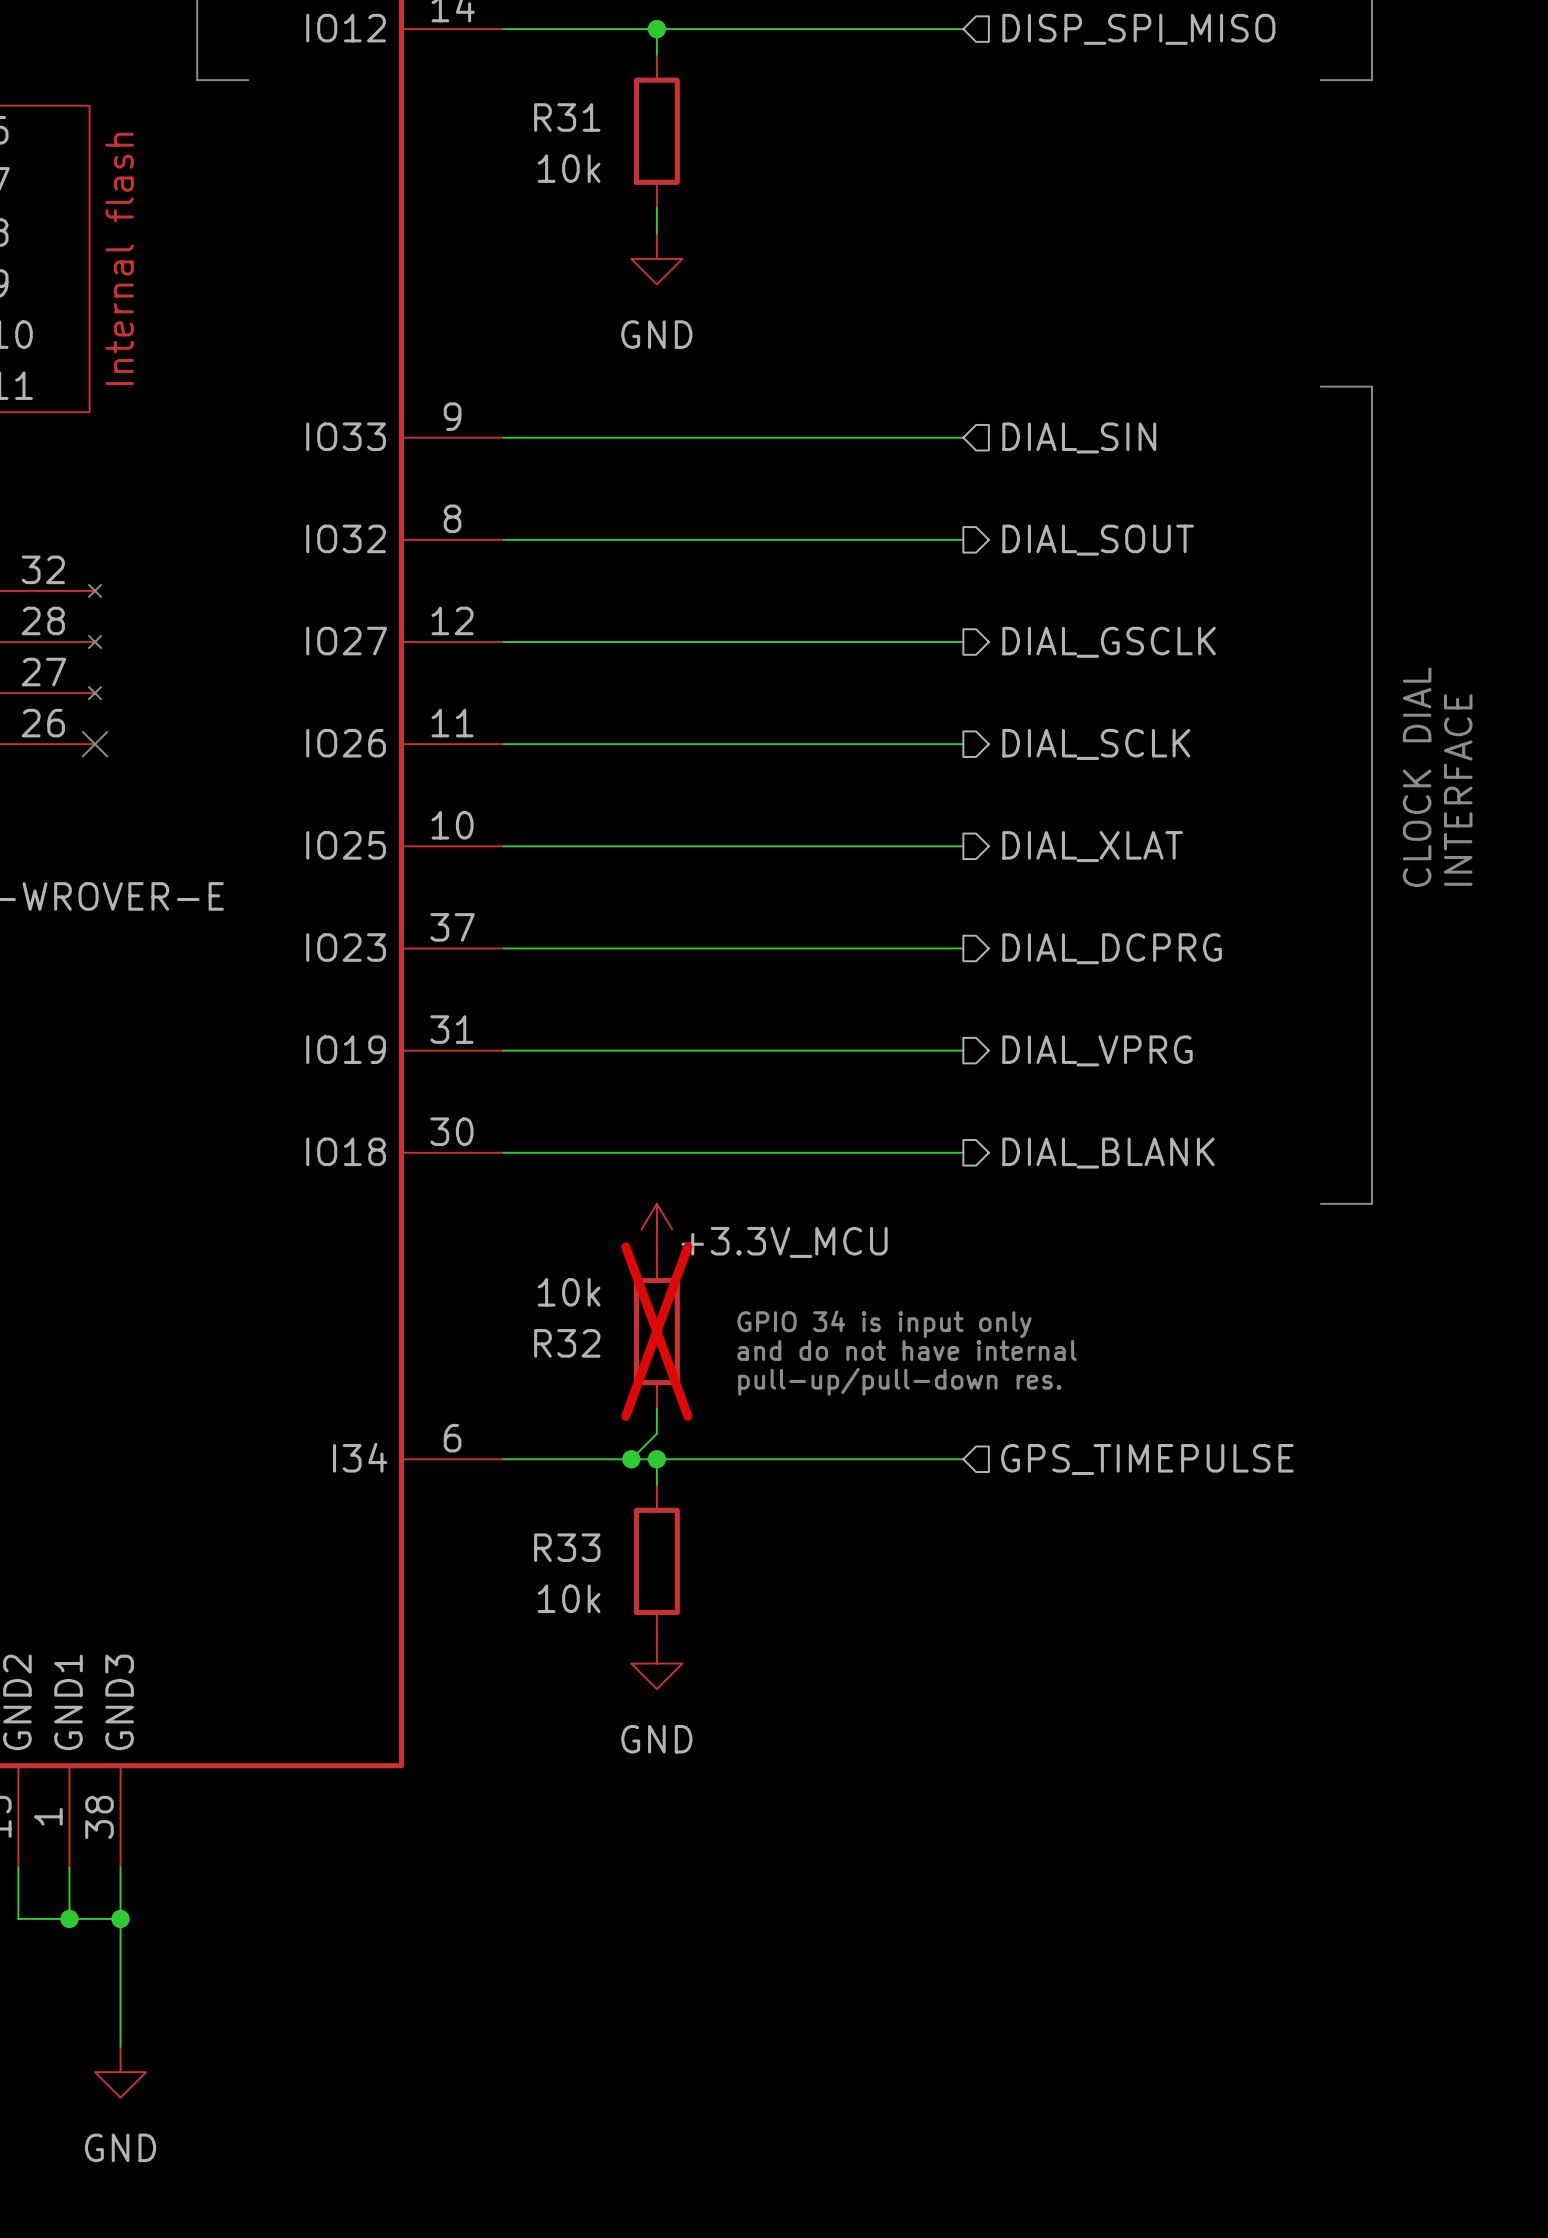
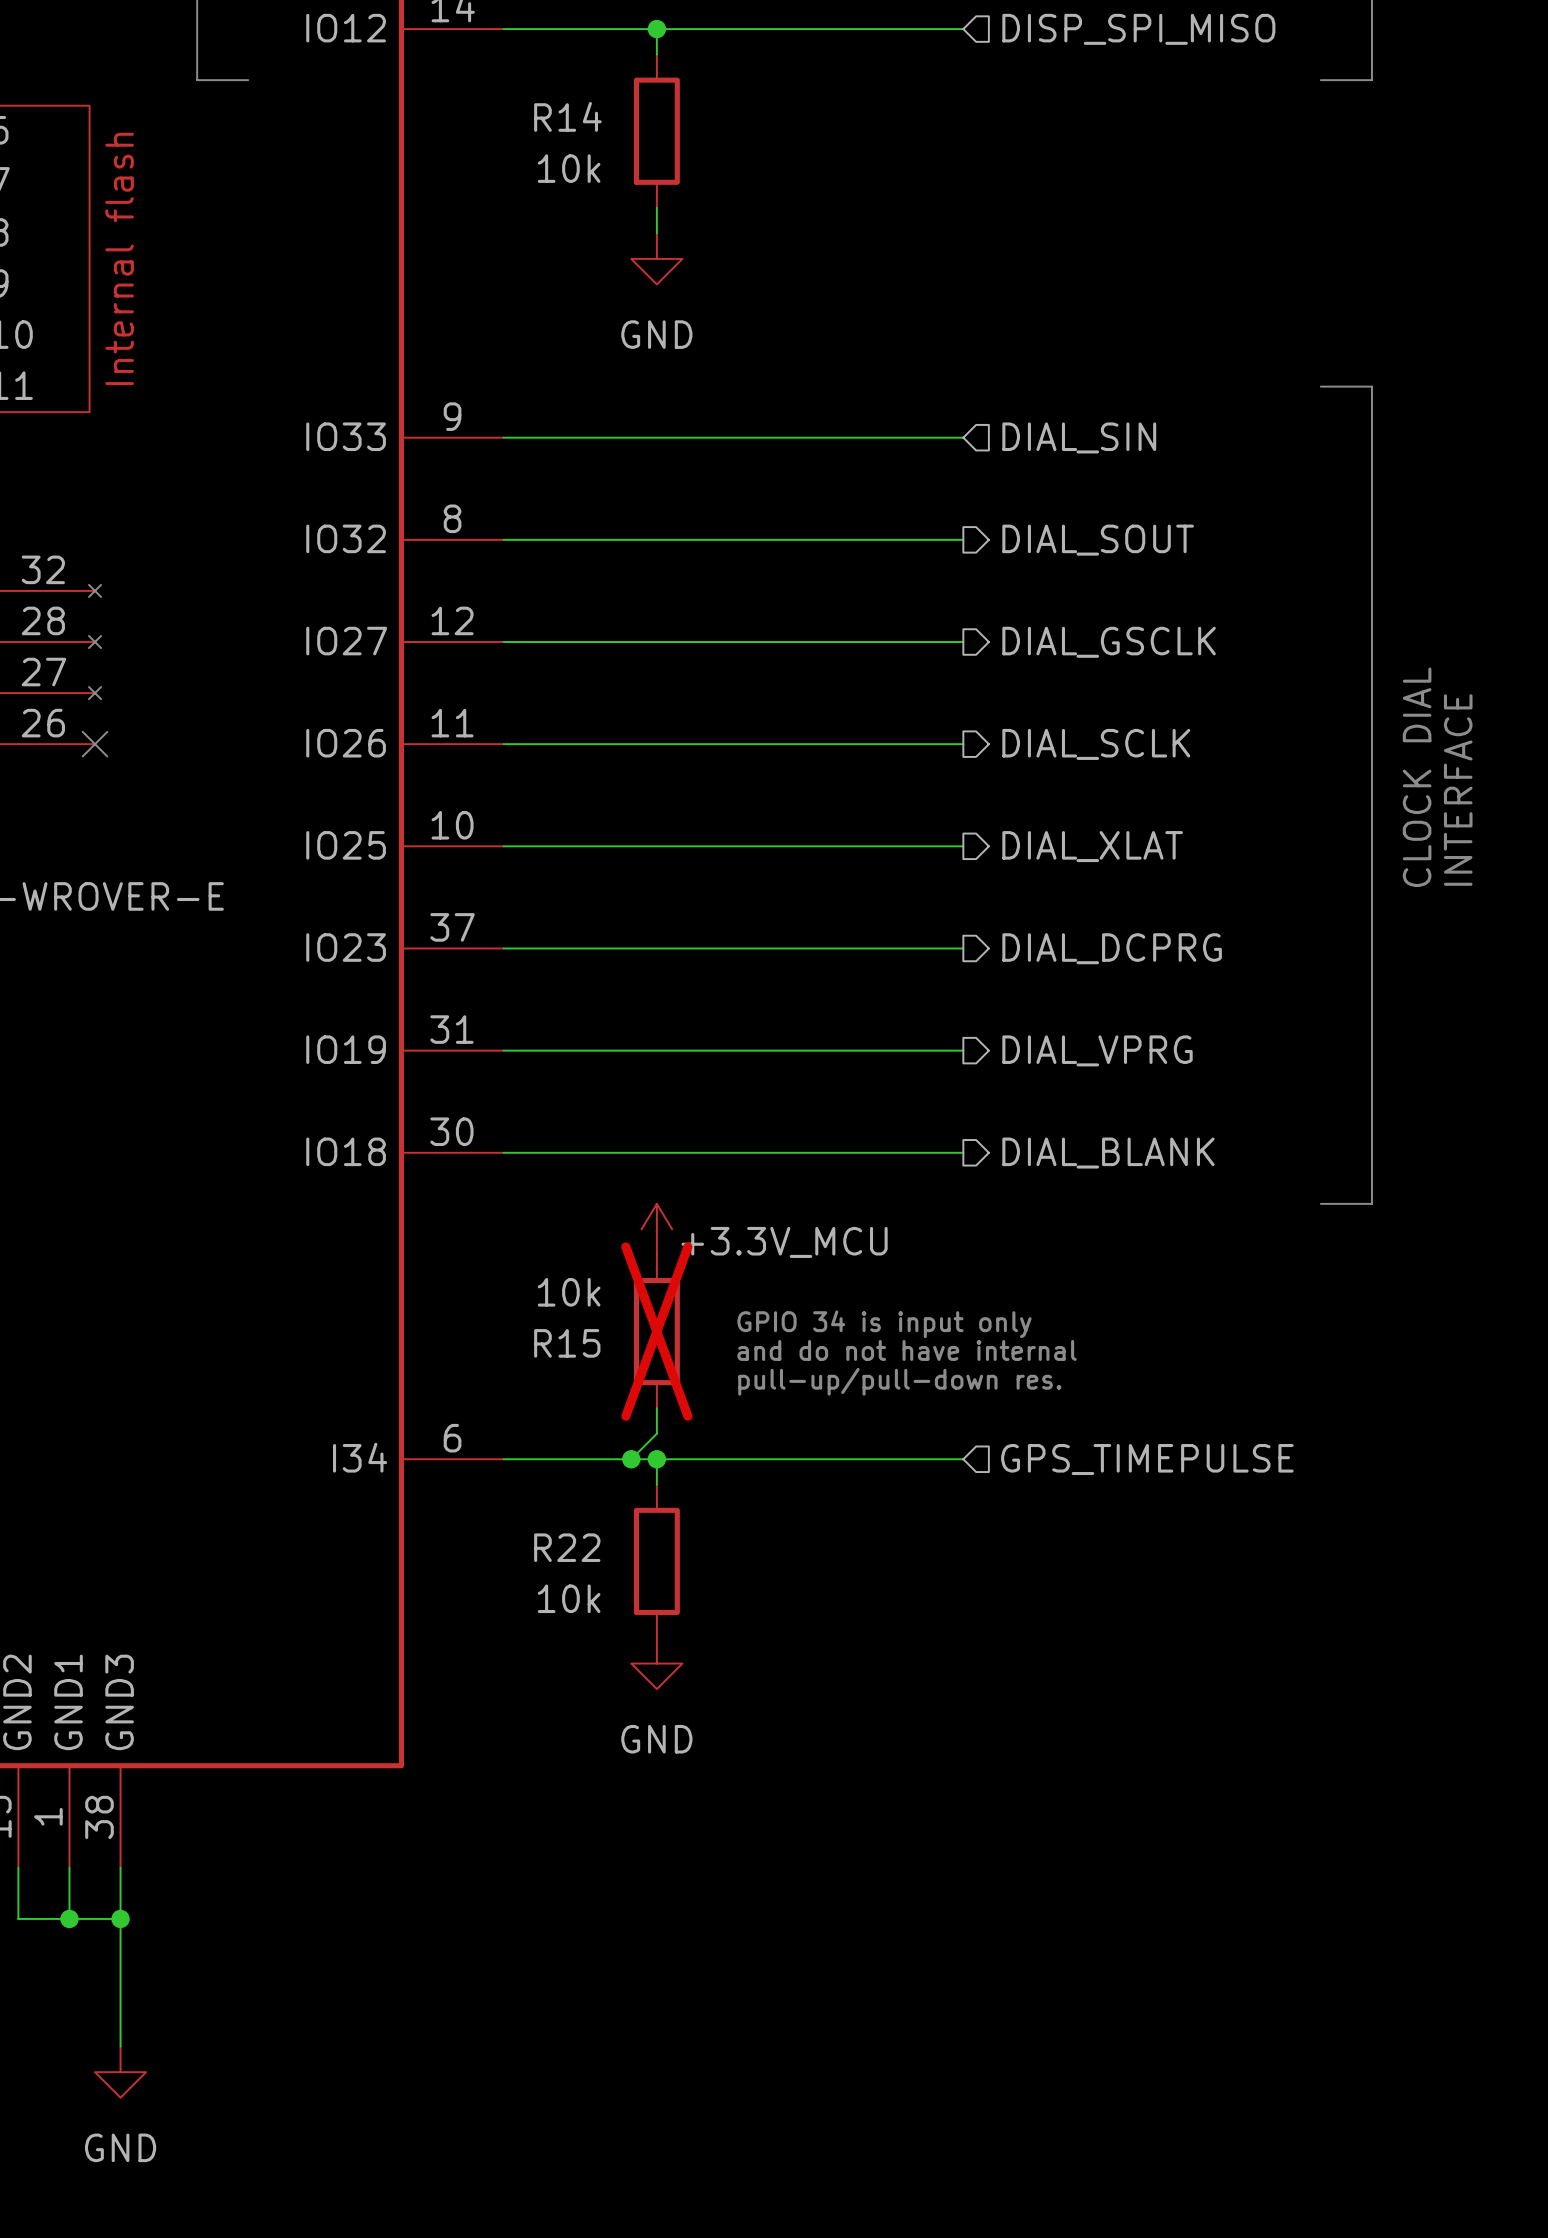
R31 name: R31 (567, 117) -> R14 (567, 116)
R32 name: R32 (567, 1343) -> R15 (567, 1343)
R33 name: R33 (567, 1547) -> R22 (567, 1547)

